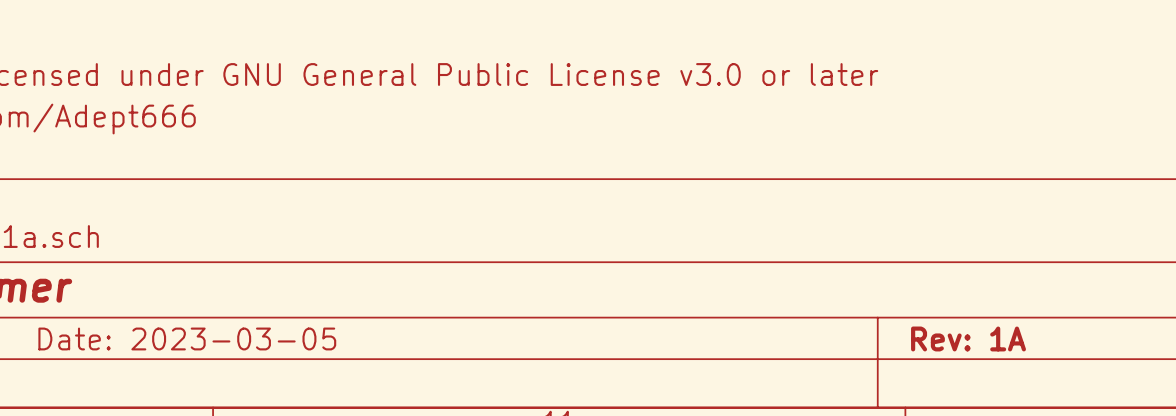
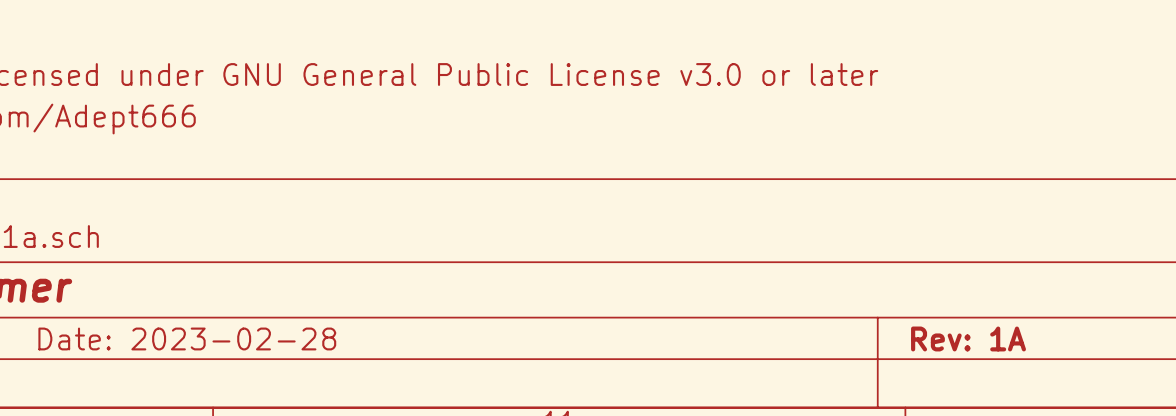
title block: Date: 2023-03-05 (187, 338) -> Date: 2023-02-28 (187, 338)

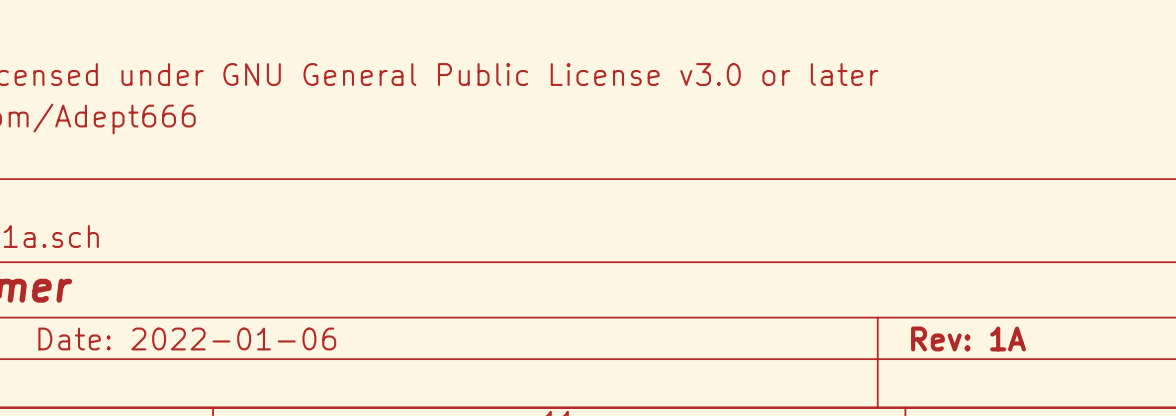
title block: Date: 2023-02-28 (187, 338) -> Date: 2022-01-06 (187, 338)

